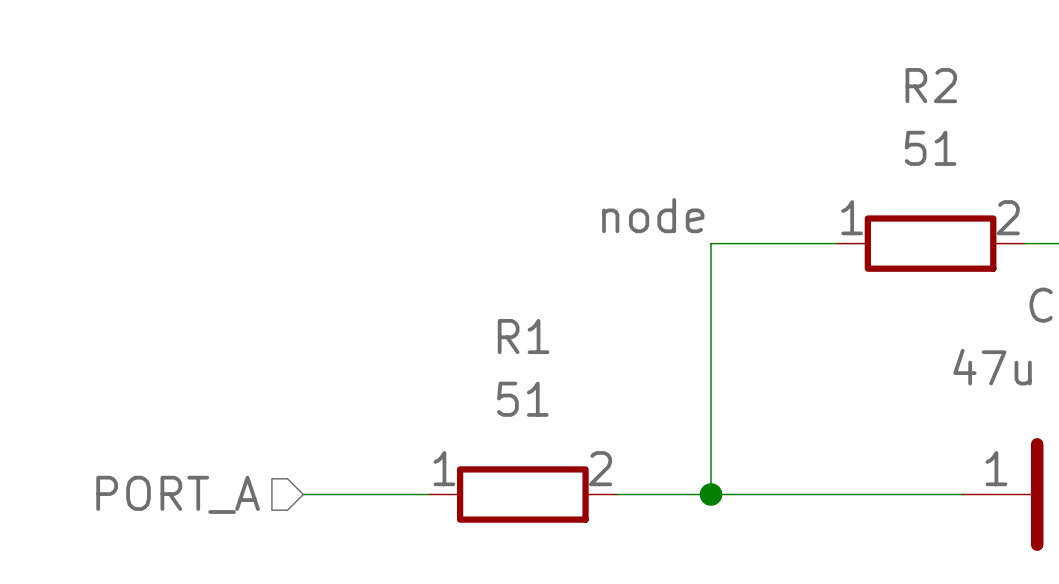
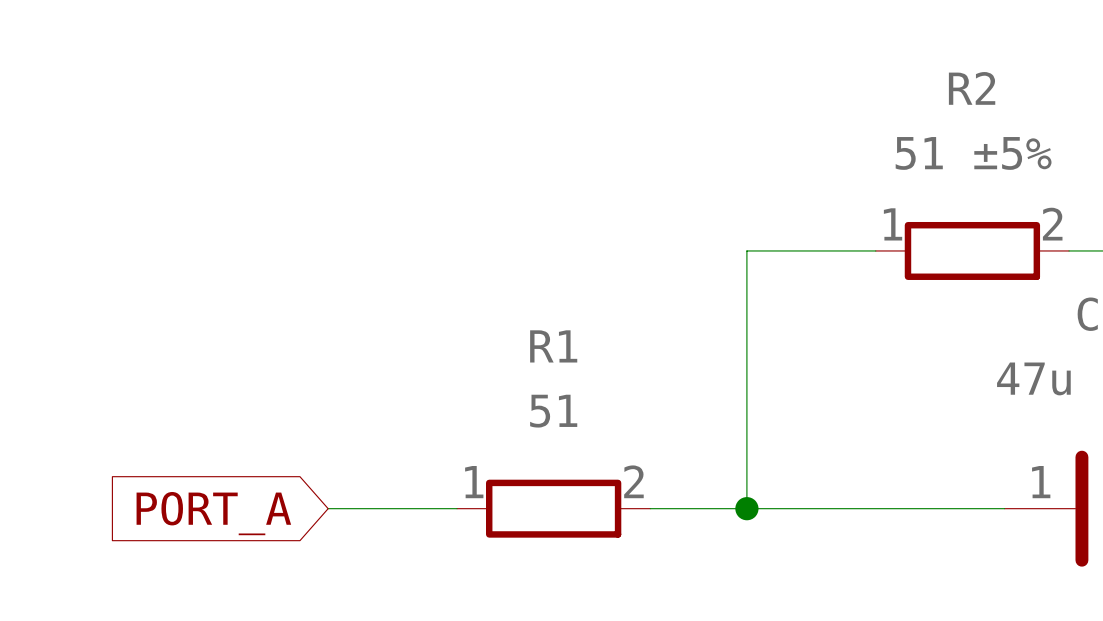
R2 value: 51 (930, 148) -> 51 ±5% (973, 153)
label: node (653, 215) -> none
hierarchical label: PORT_A (178, 494) -> none
global label: none -> PORT_A (213, 513)

